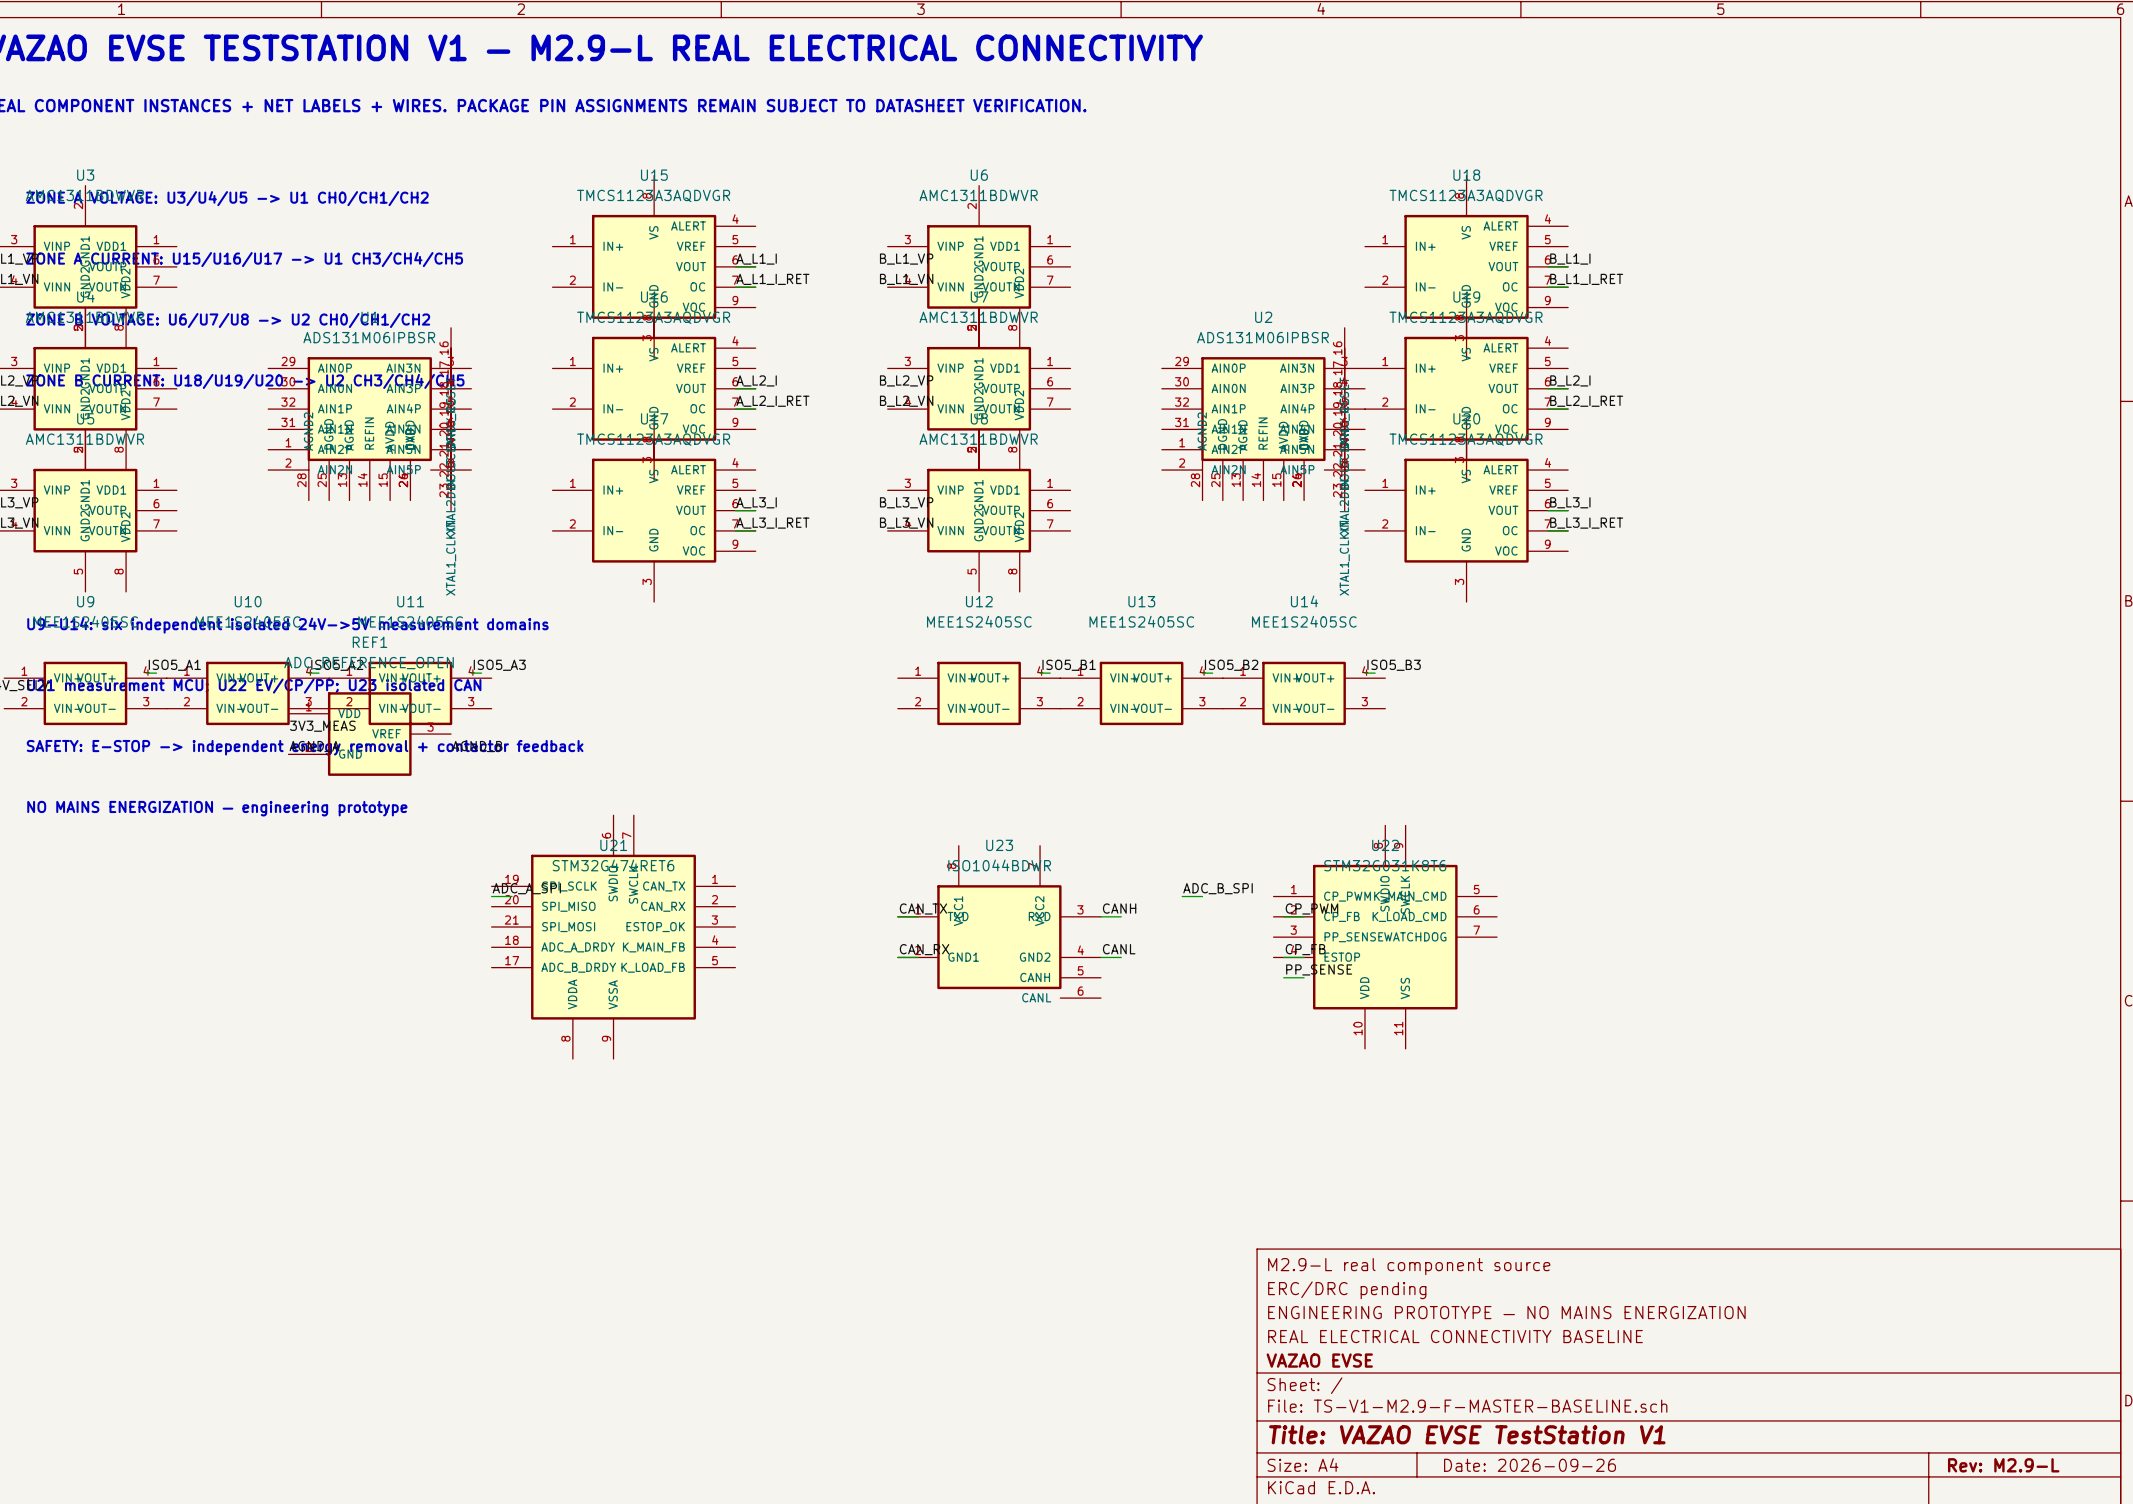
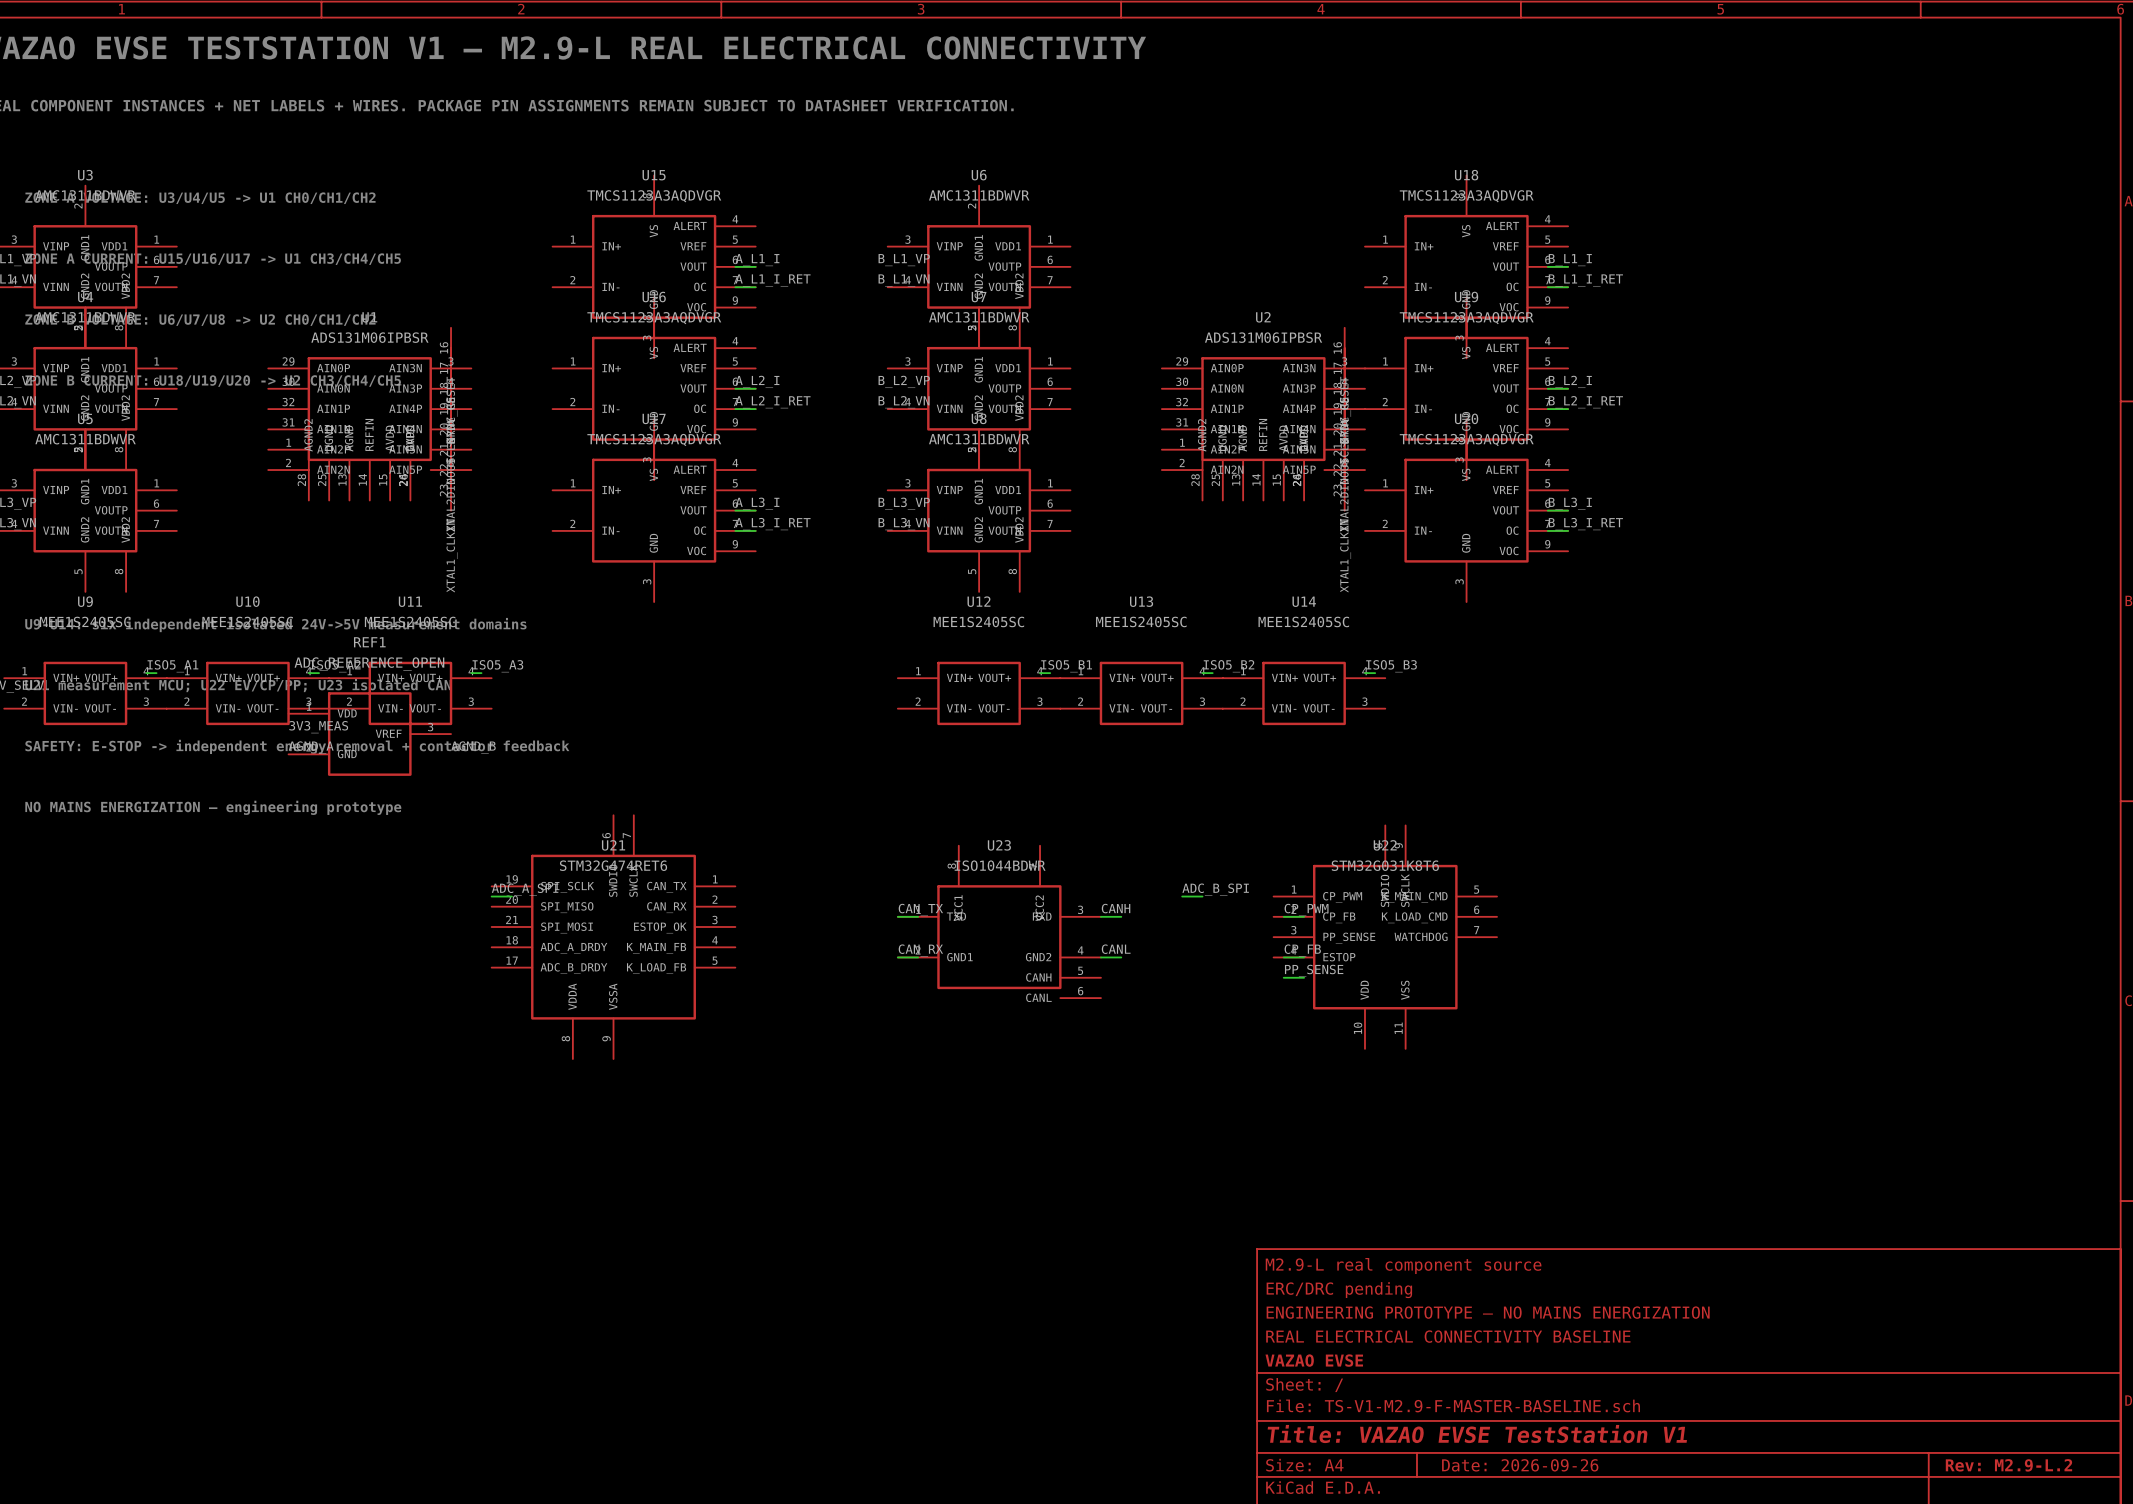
title block: Rev: M2.9-L (2003, 1465) -> Rev: M2.9-L.2 (2008, 1465)

